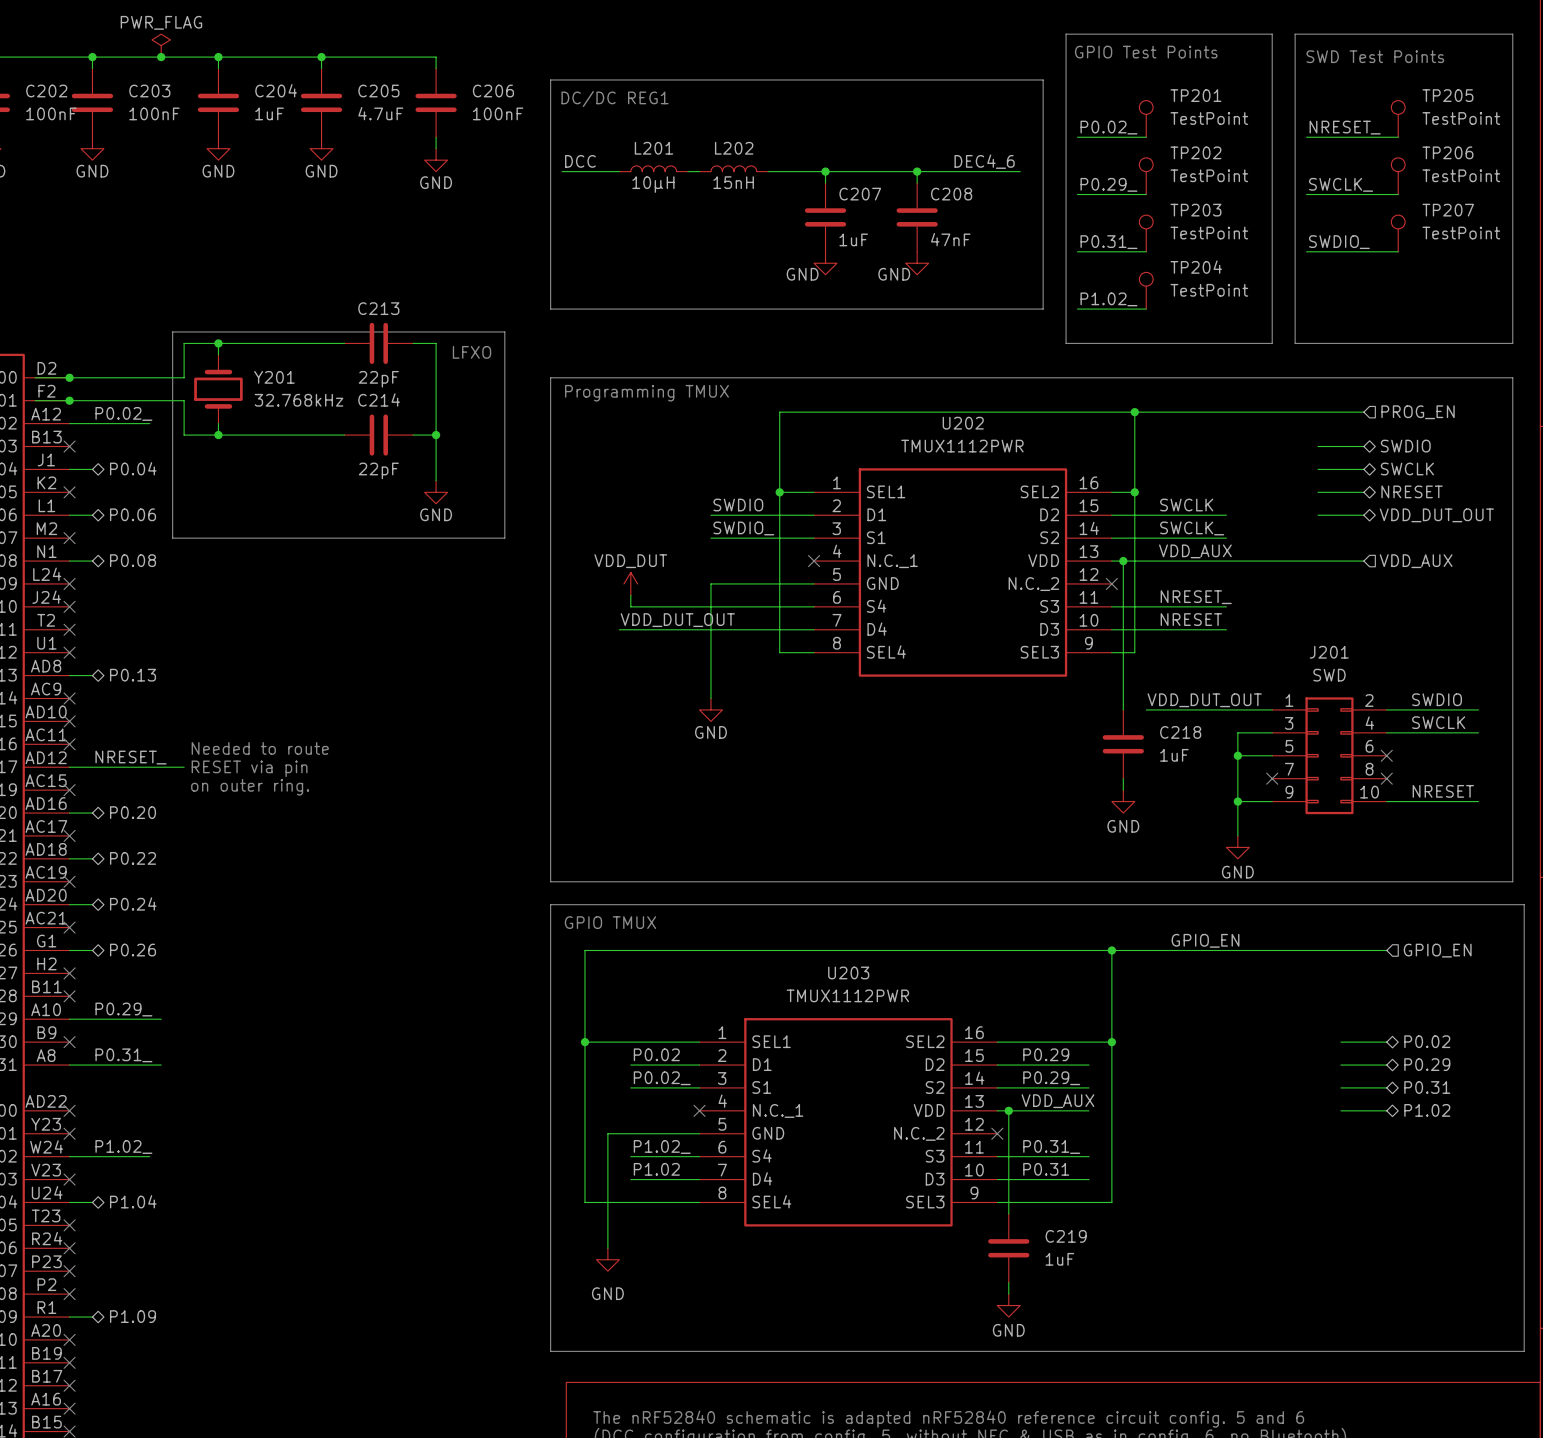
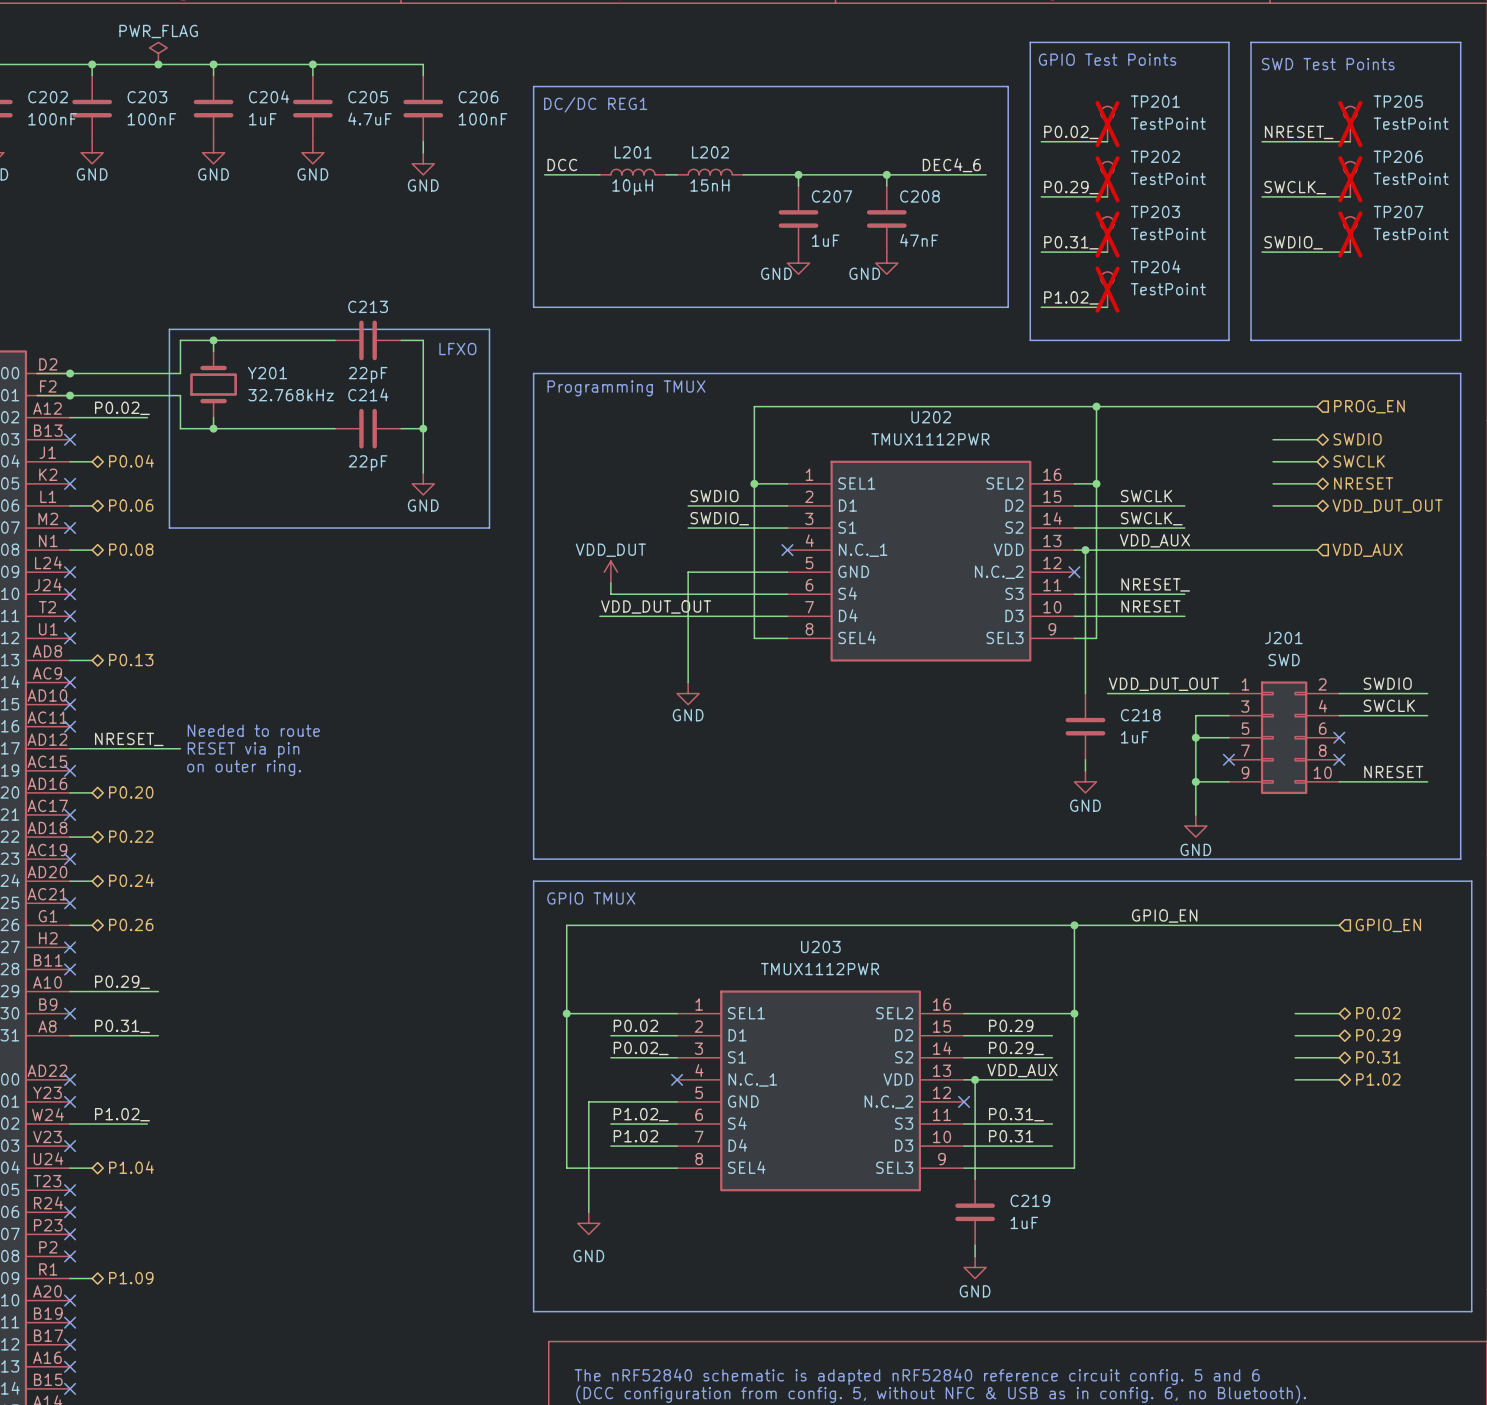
TP201 do-not-place cross: none -> (1107, 124)
TP205 do-not-place cross: none -> (1350, 124)
TP202 do-not-place cross: none -> (1107, 179)
TP206 do-not-place cross: none -> (1350, 179)
TP203 do-not-place cross: none -> (1107, 234)
TP207 do-not-place cross: none -> (1350, 234)
TP204 do-not-place cross: none -> (1107, 289)

